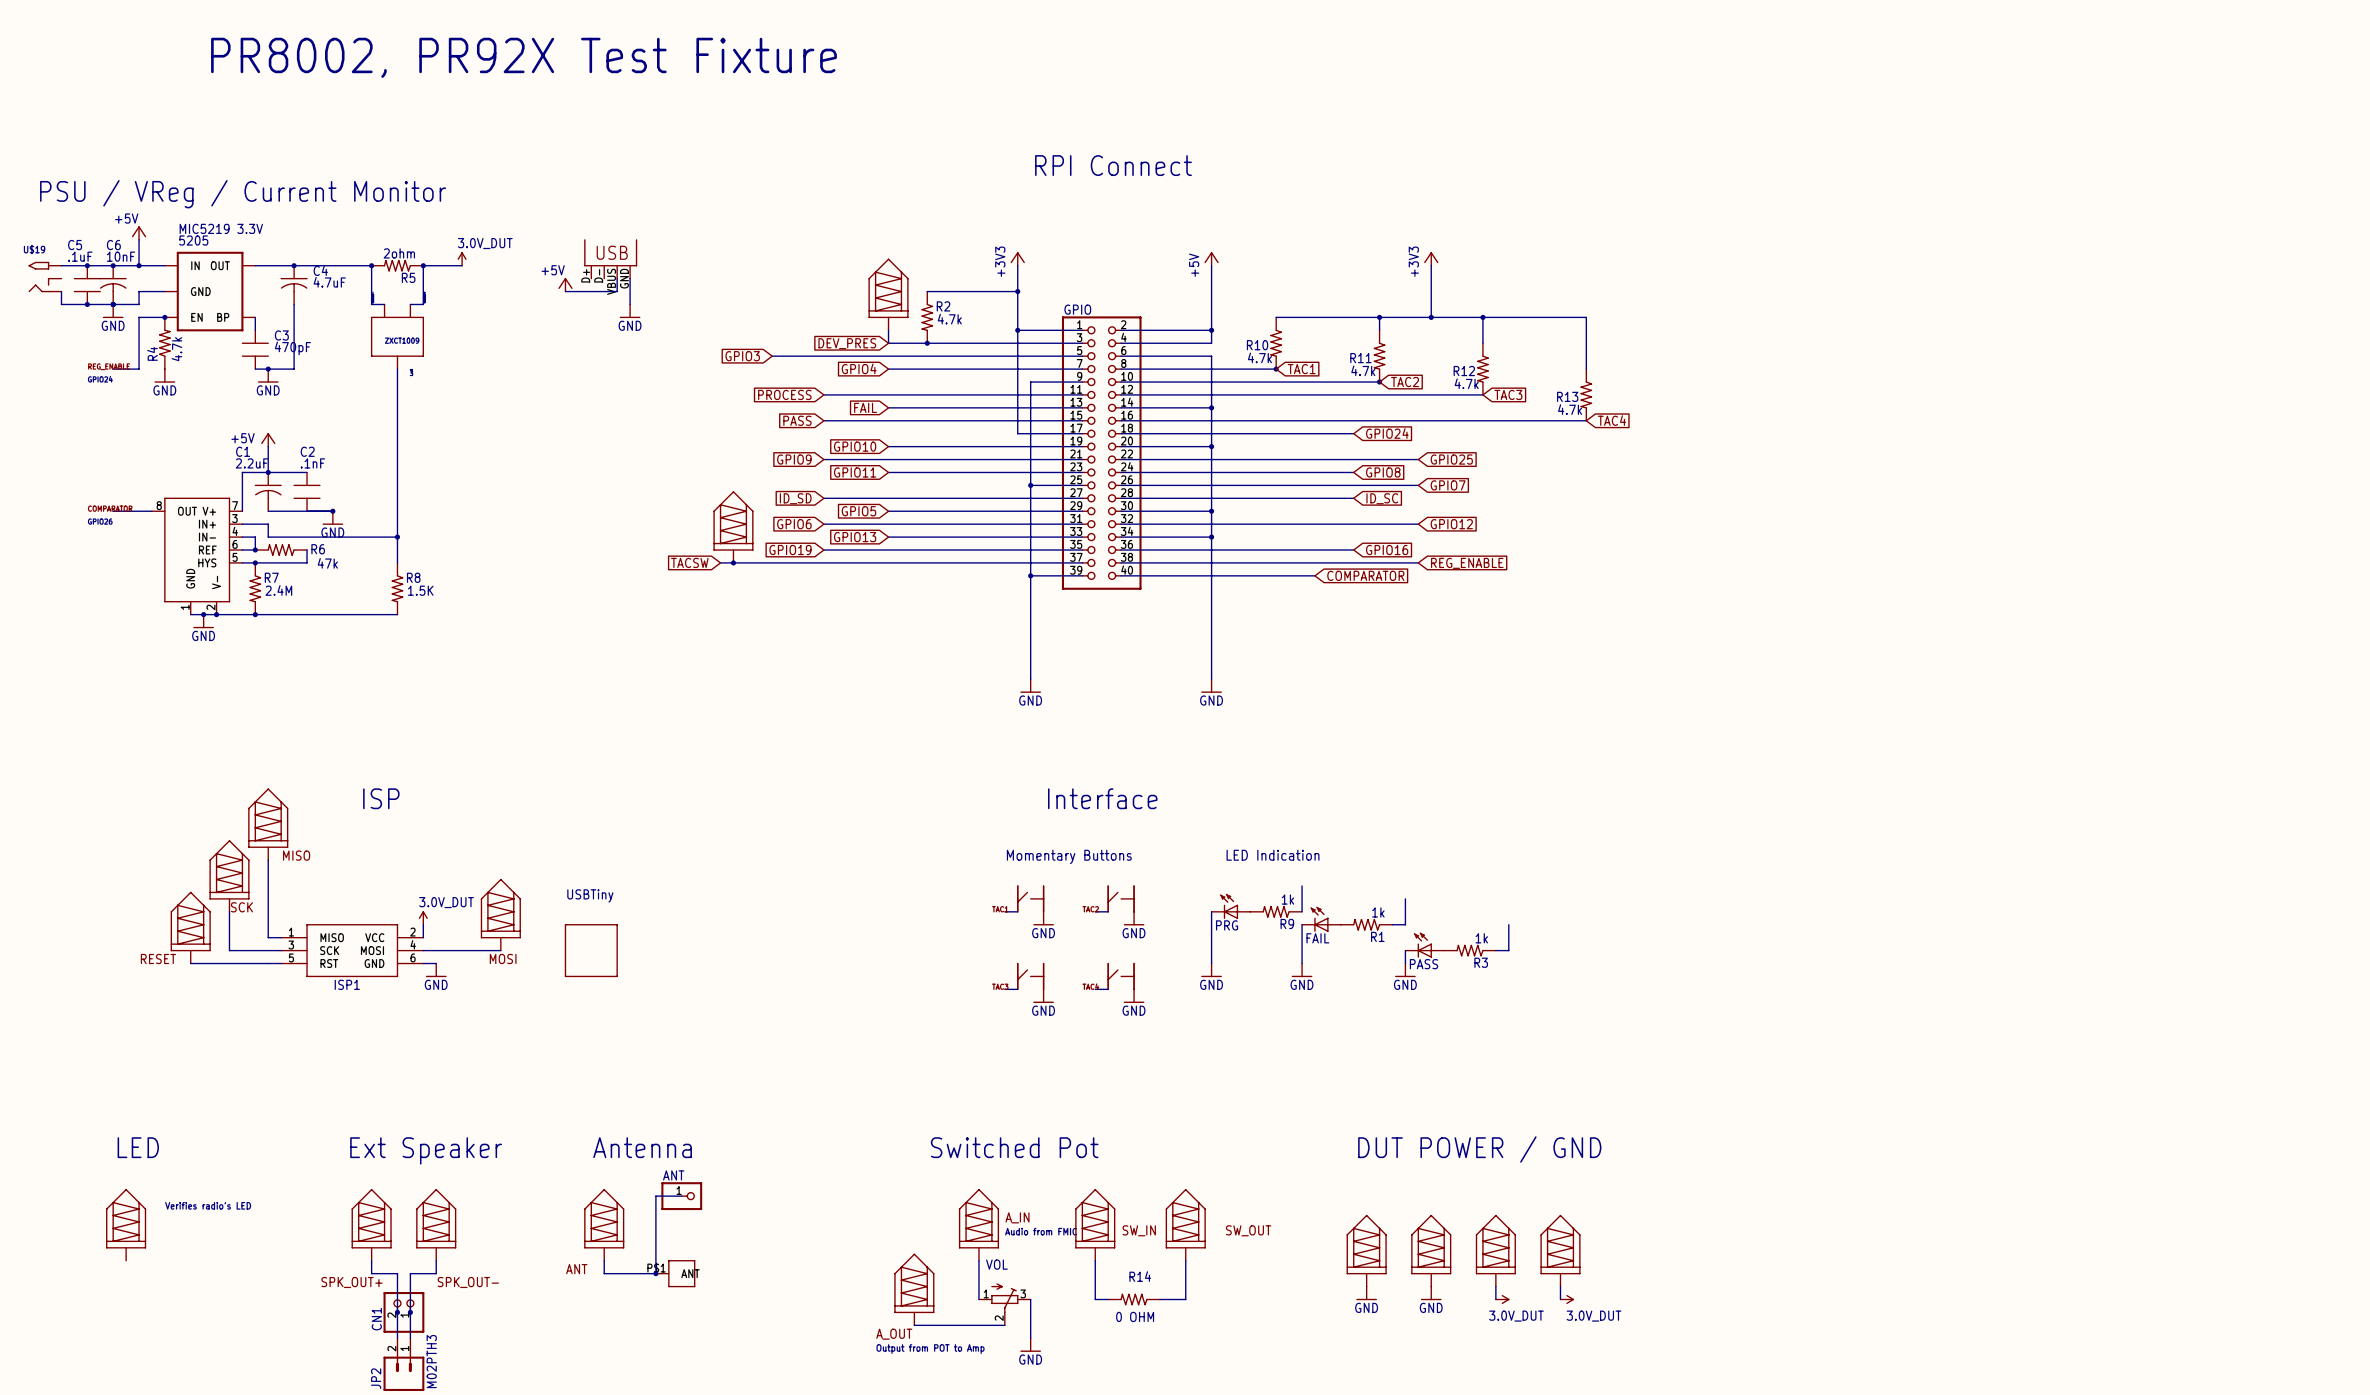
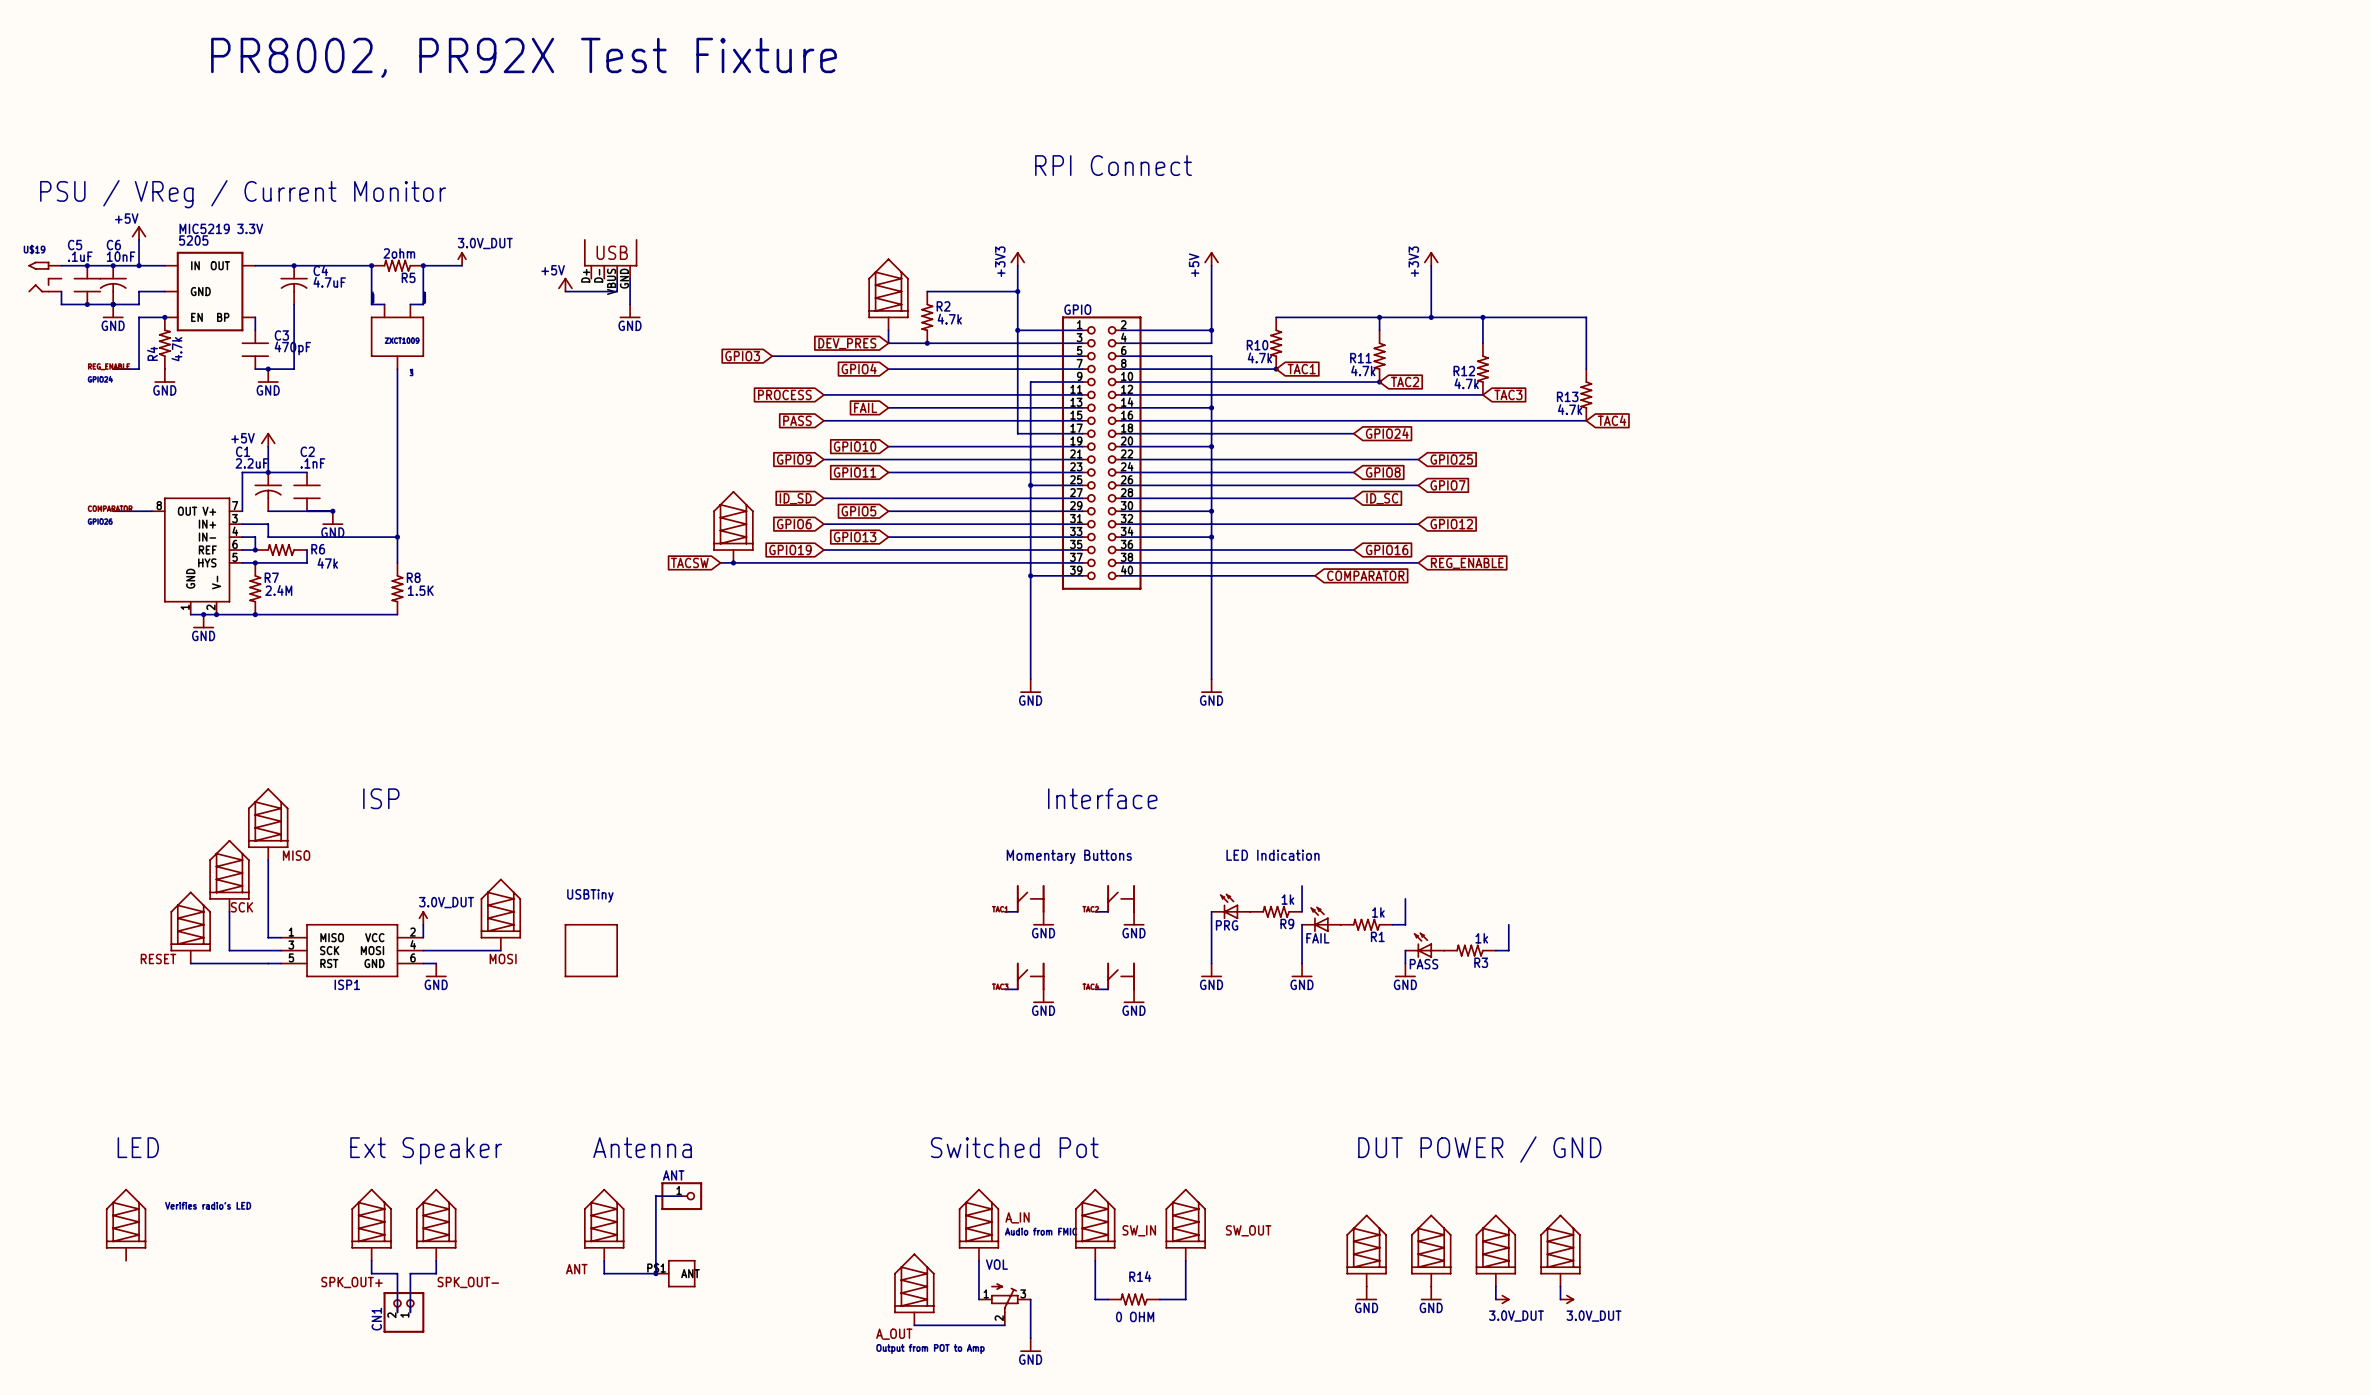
wire: (397, 1312) (397, 1338) -> none
junction: (397, 1312) -> none
wire: (410, 1312) (410, 1338) -> none
junction: (410, 1312) -> none
JP2: M02PTH3 (403, 1364) -> none

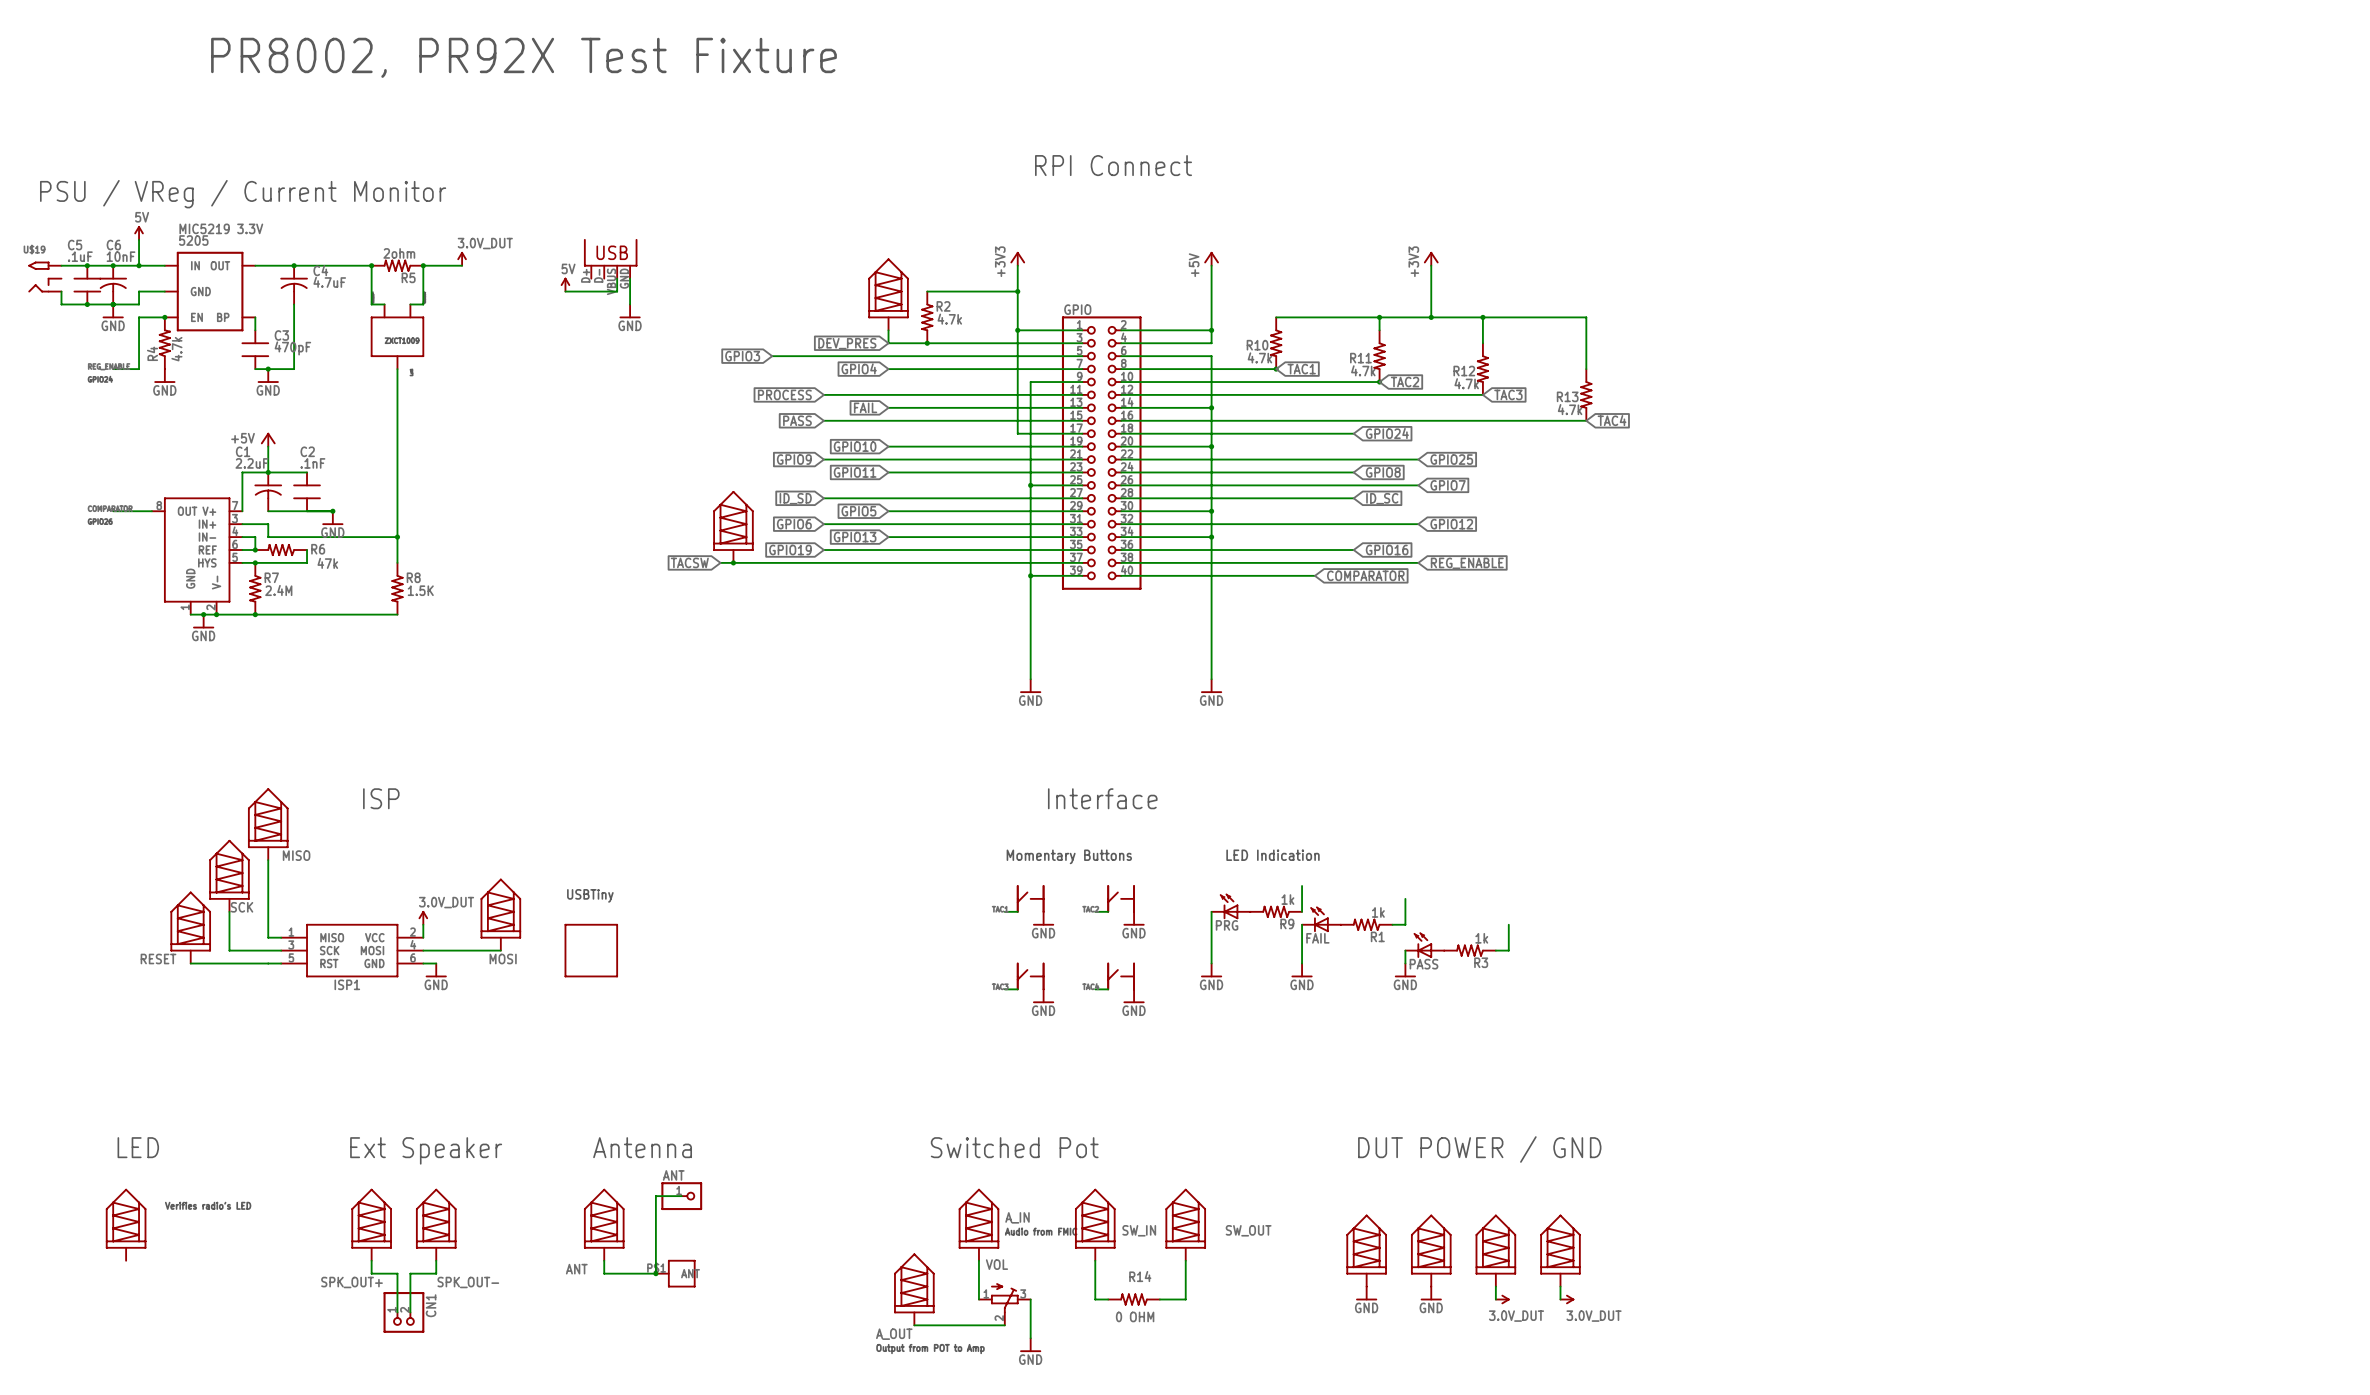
power symbol: +5V (139, 233) -> 5V (139, 233)
power symbol: +5V (565, 284) -> 5V (565, 284)
CN1 rotation: 0° (403, 1312) -> 180° (403, 1312)

